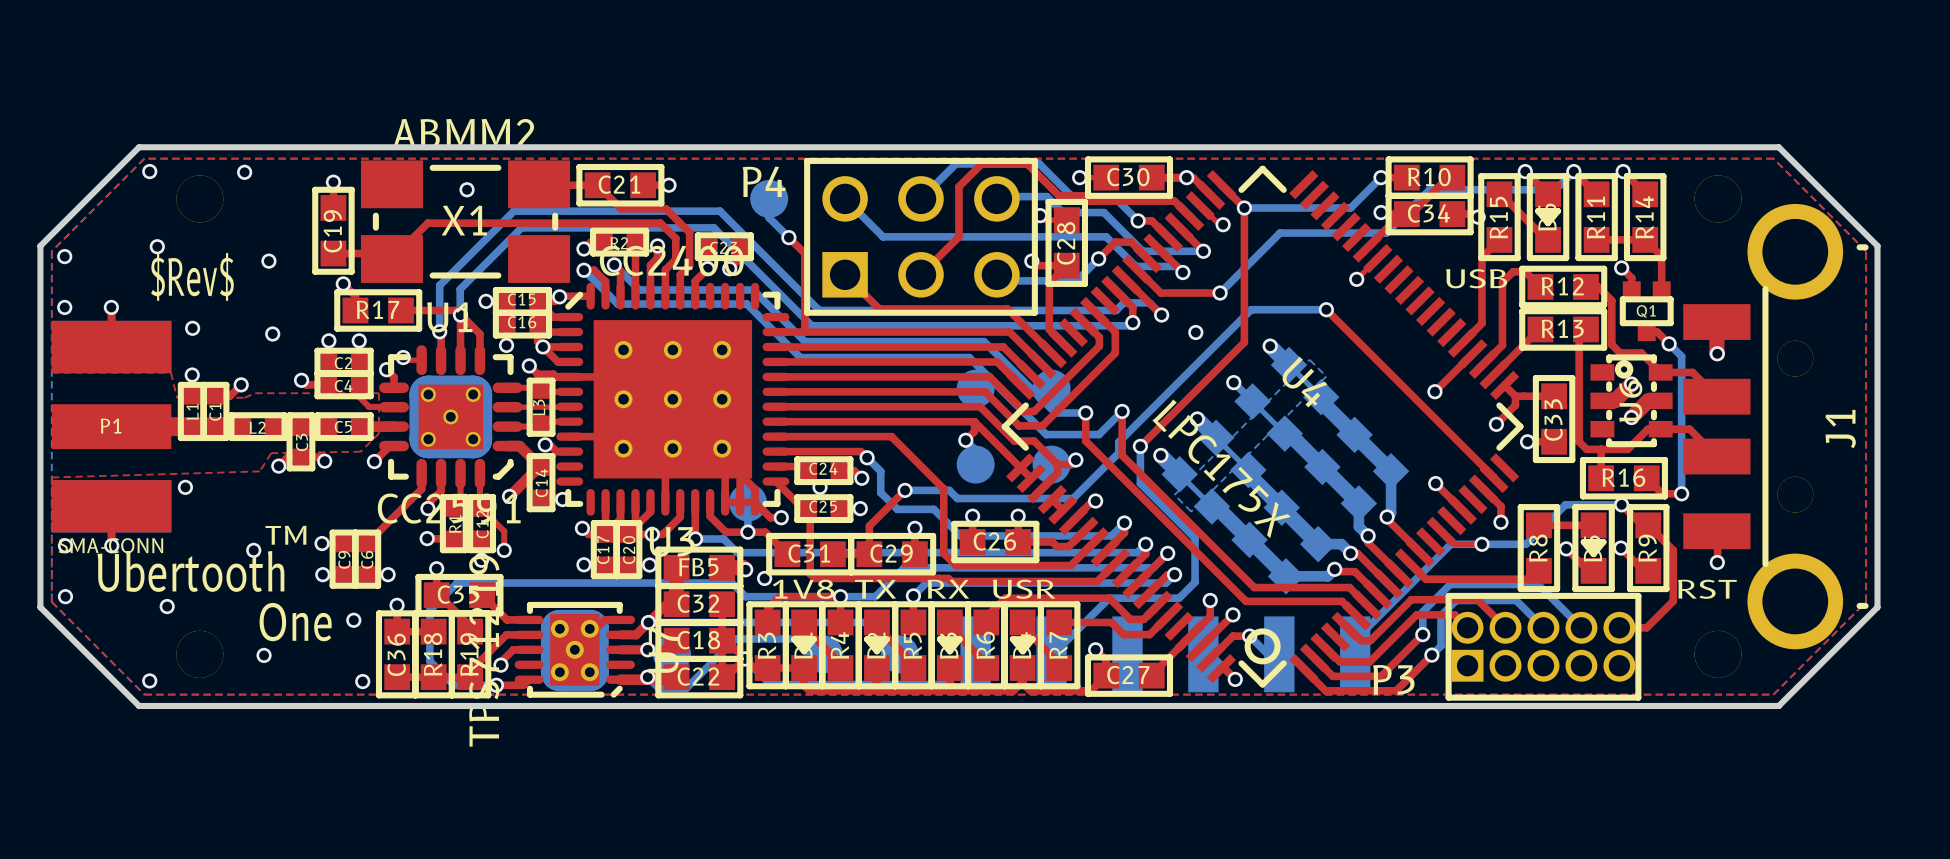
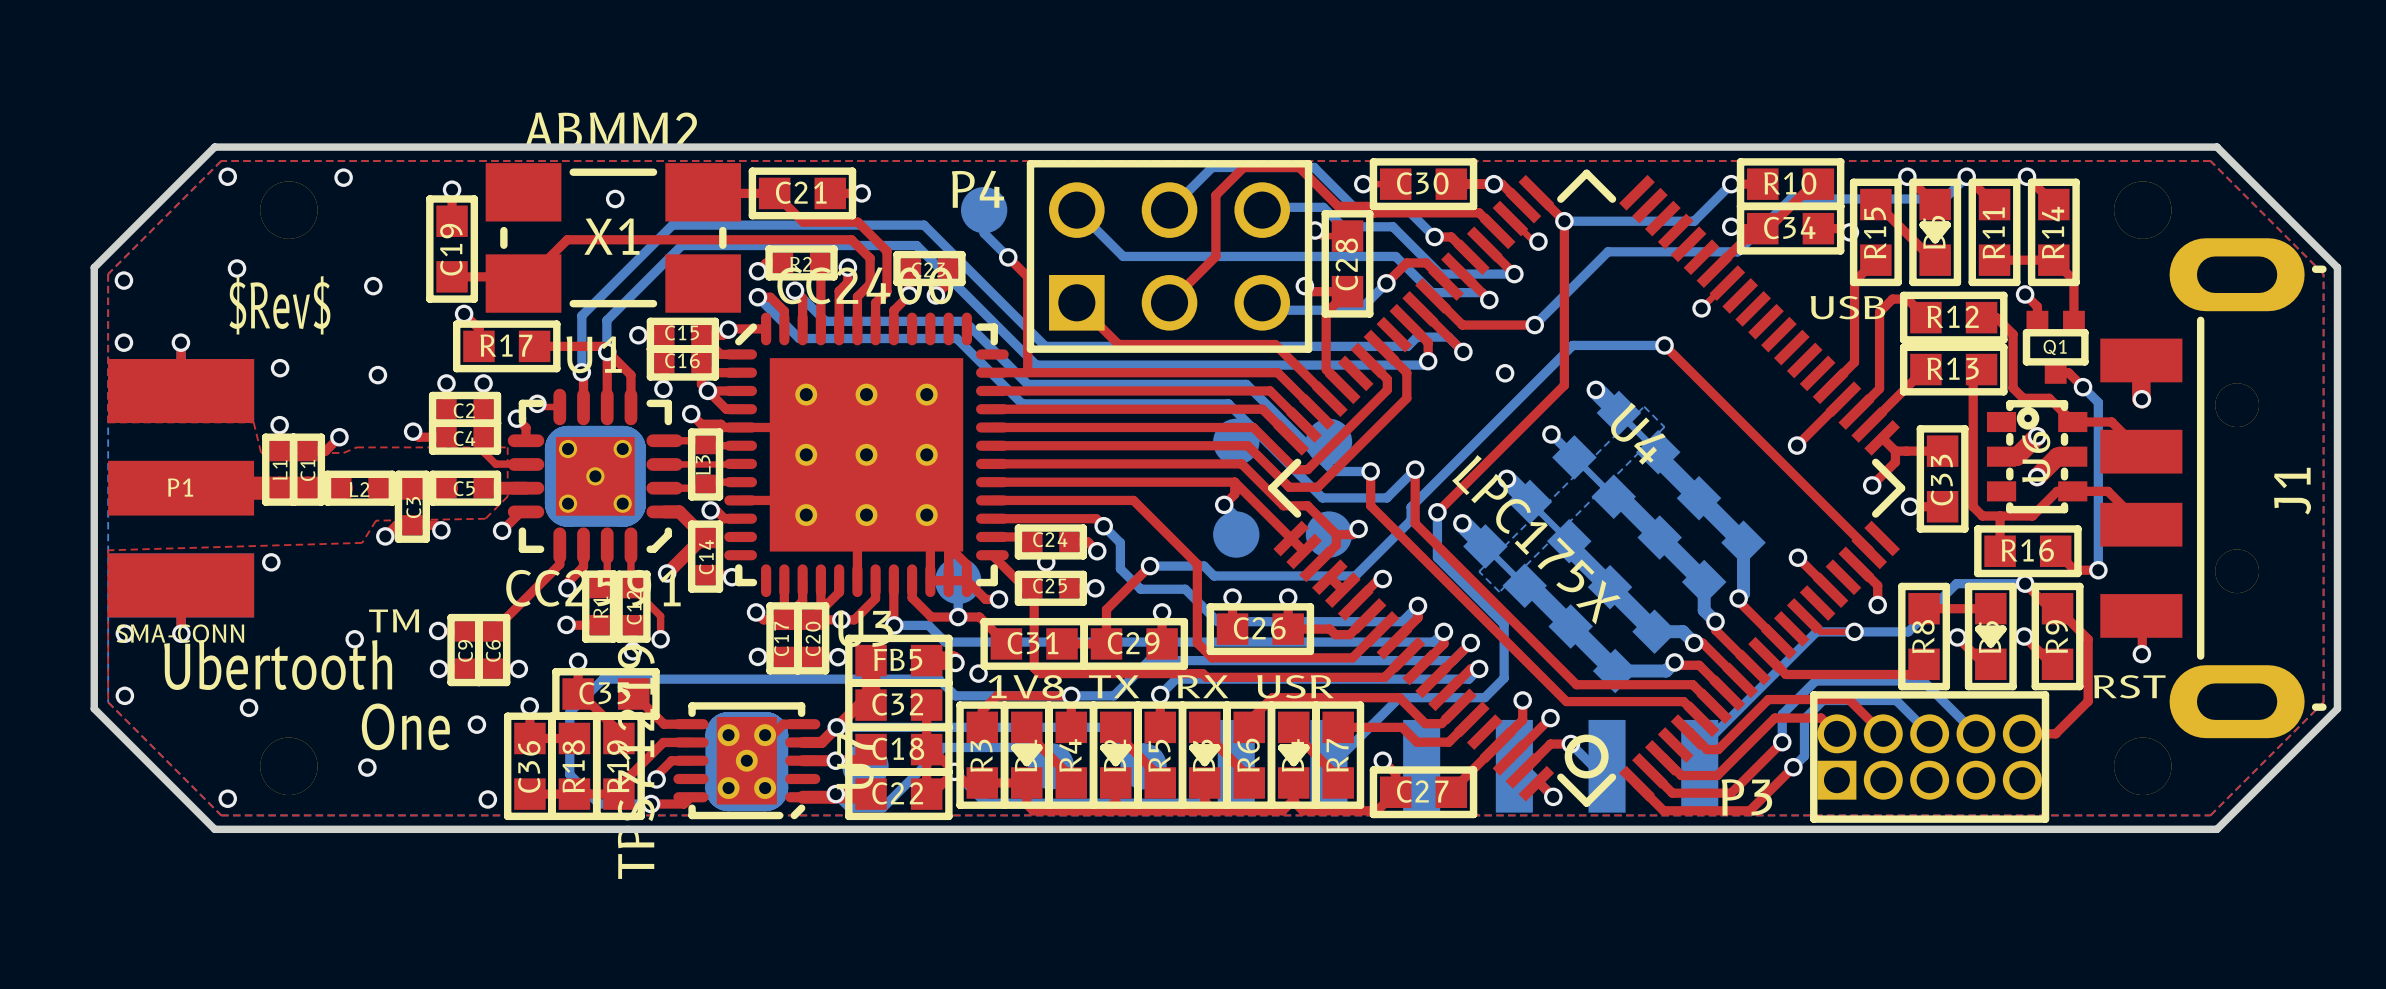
J1 footprint: [1683, 203, 1869, 650] -> [2100, 238, 2327, 739]

